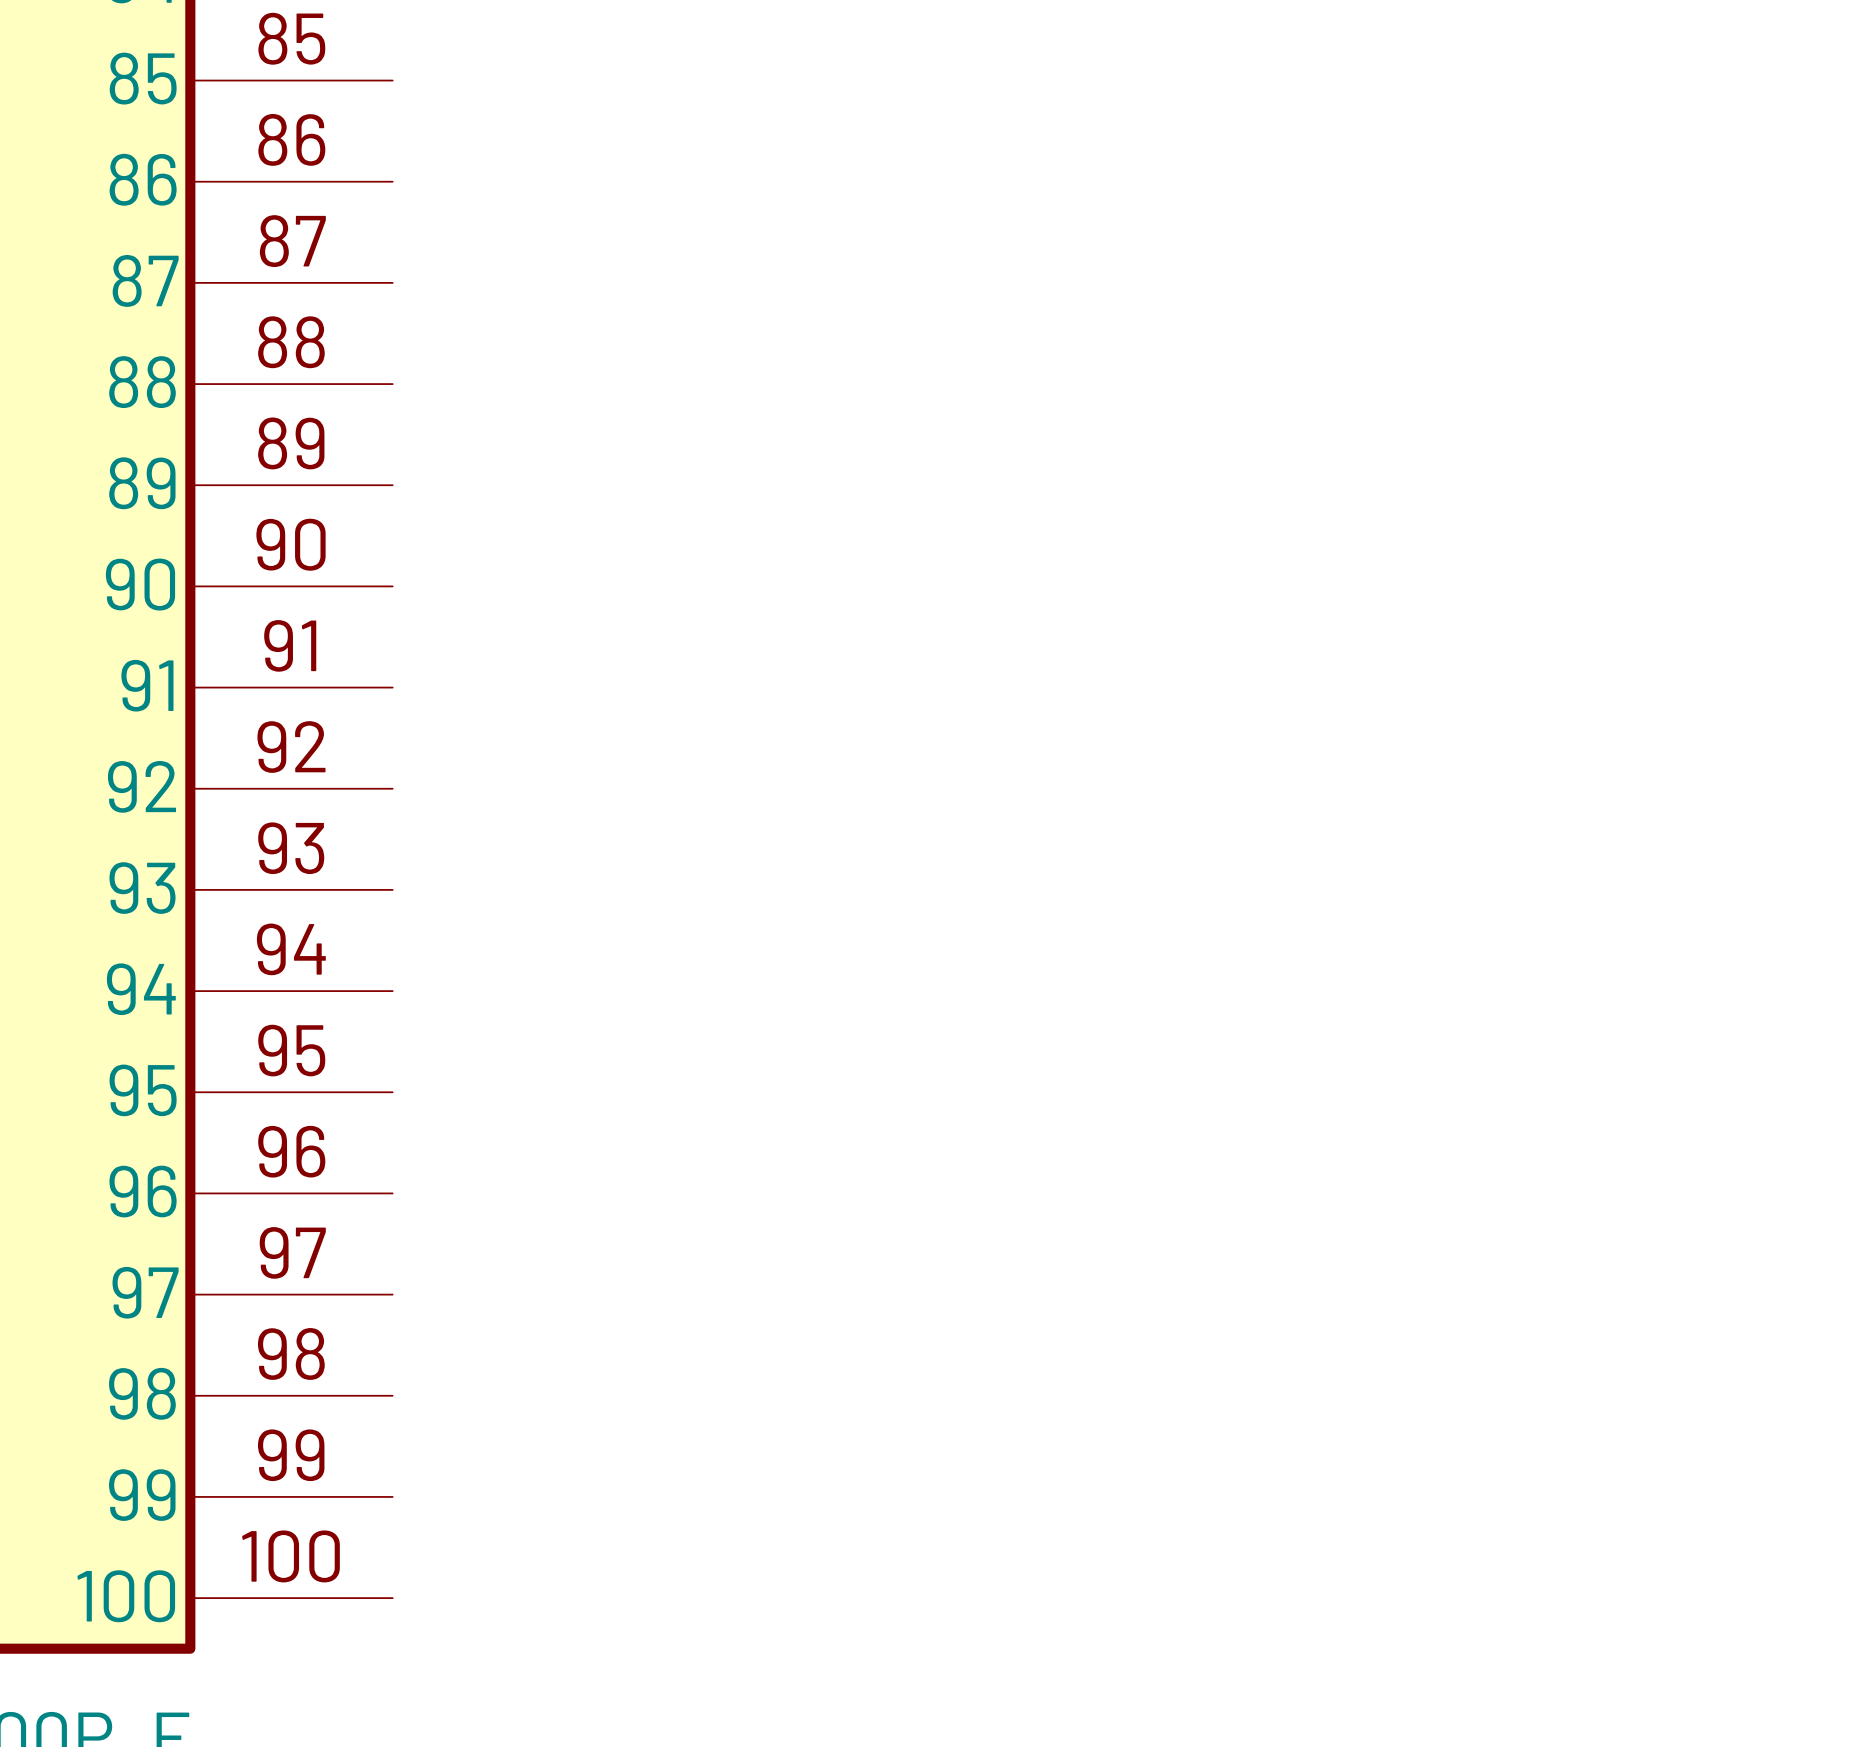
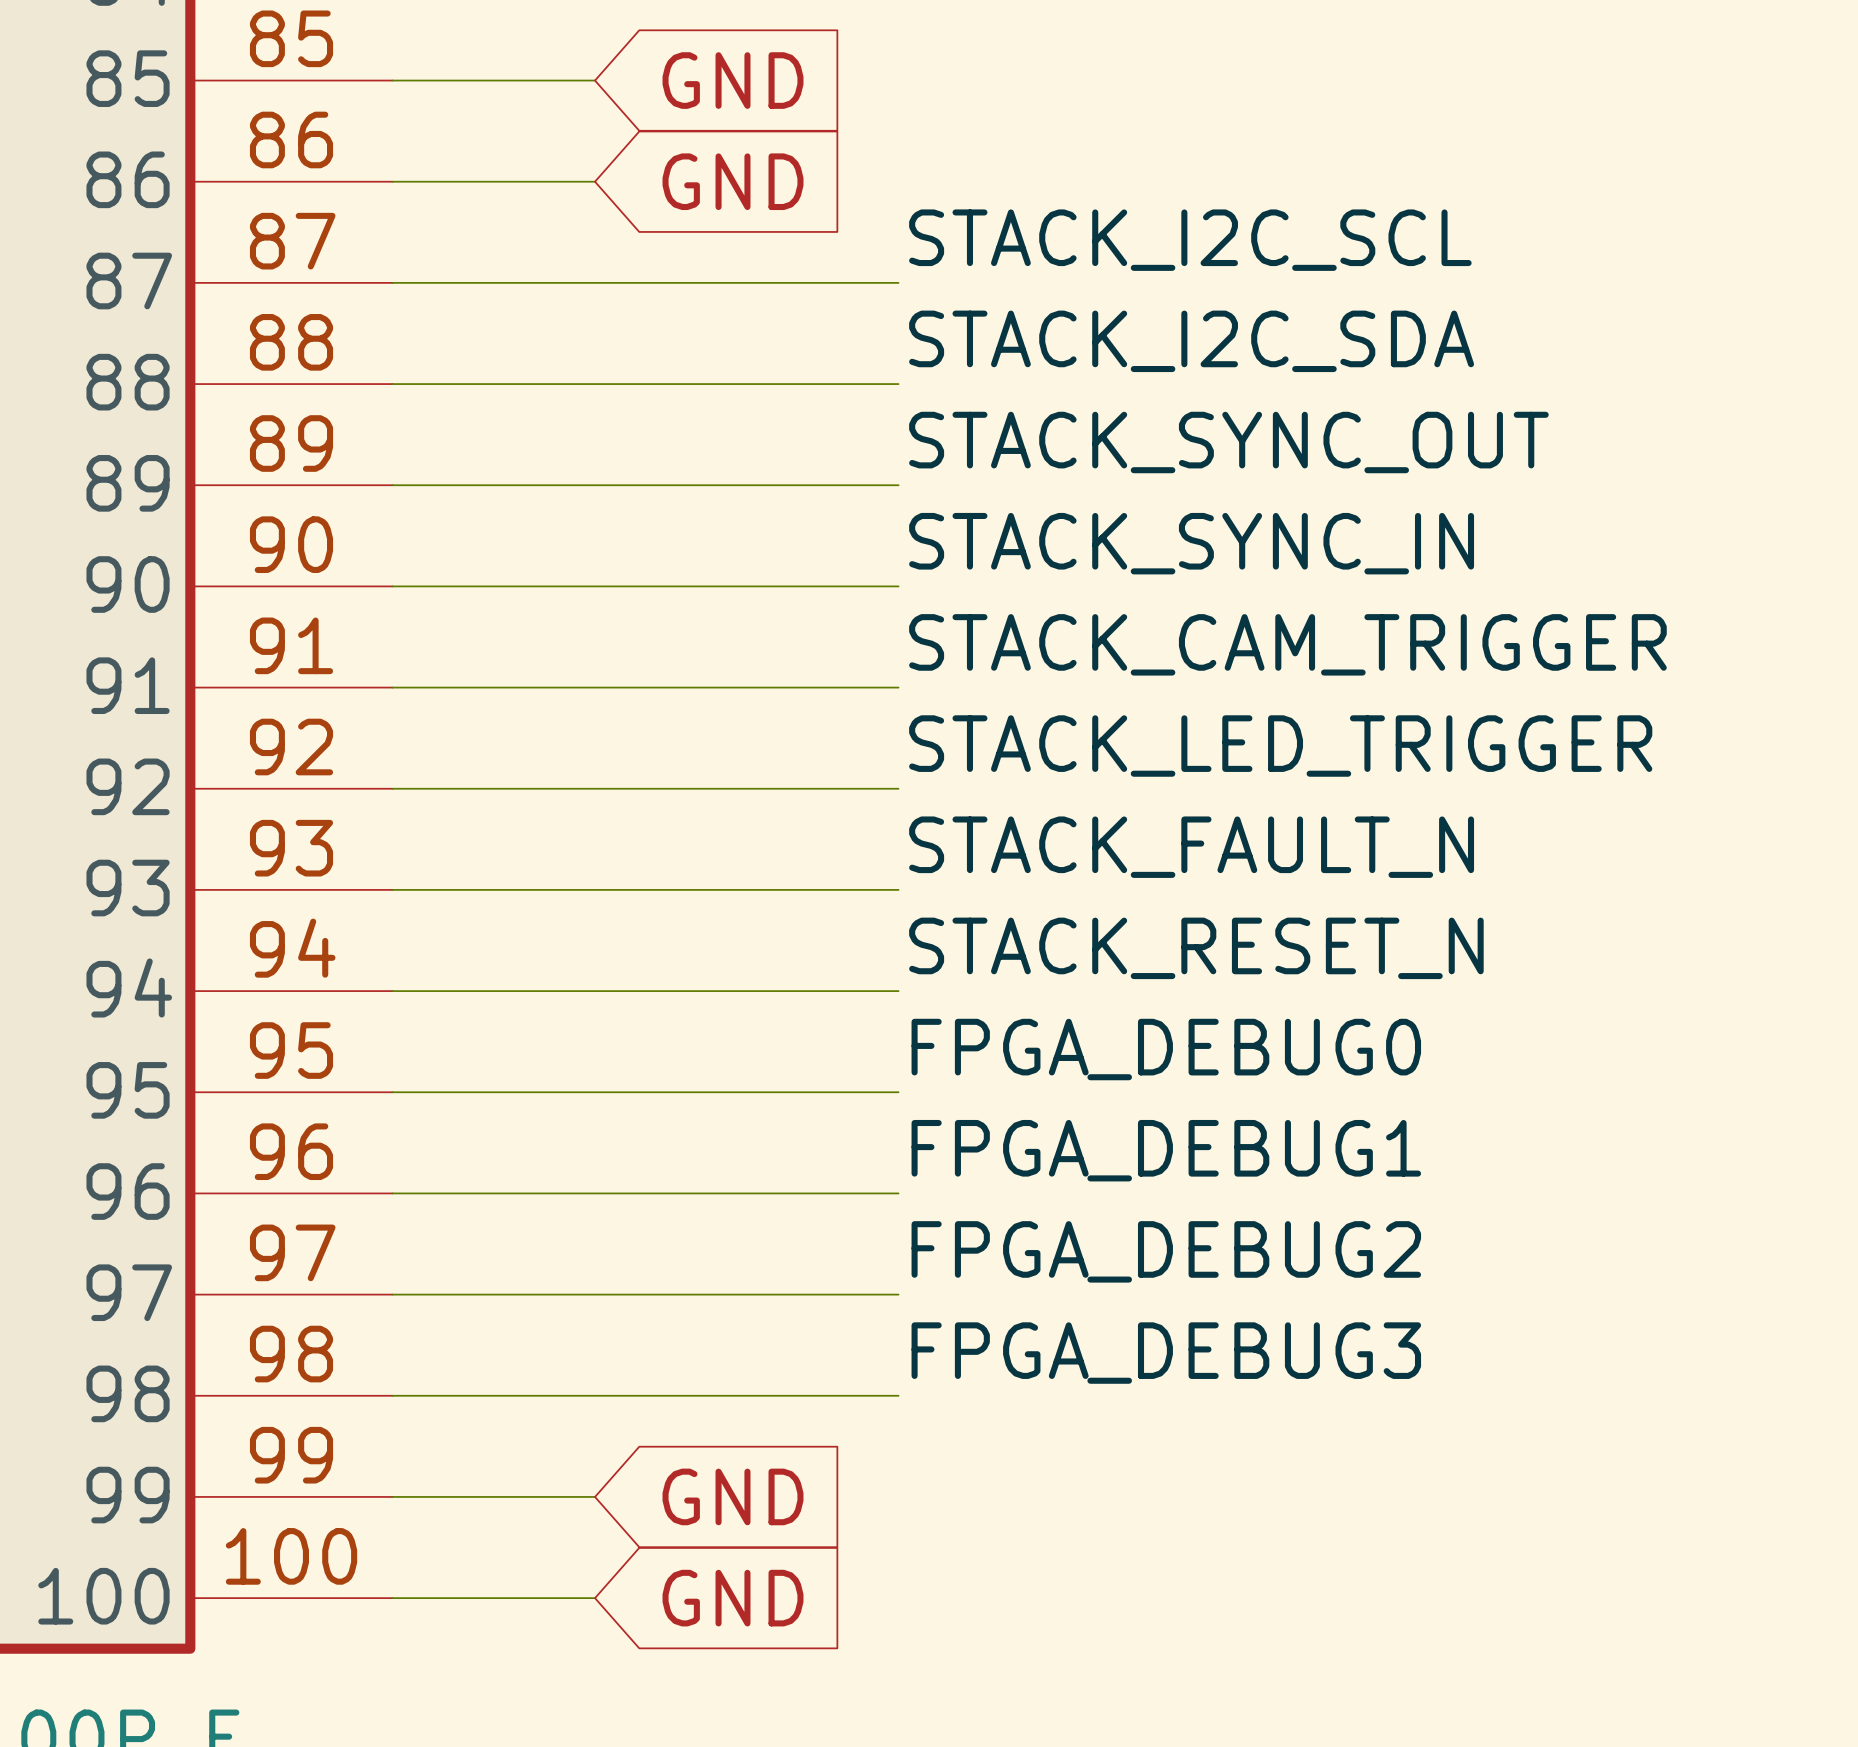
wire: none -> (392, 80) (595, 80)
global label: none -> GND (733, 80)
wire: none -> (392, 181) (595, 181)
global label: none -> GND (733, 181)
label: none -> STACK_I2C_SCL (1190, 240)
wire: none -> (392, 282) (898, 282)
label: none -> STACK_I2C_SDA (1191, 341)
wire: none -> (392, 384) (898, 384)
label: none -> STACK_SYNC_OUT (1228, 442)
wire: none -> (392, 485) (898, 485)
label: none -> STACK_SYNC_IN (1191, 543)
wire: none -> (392, 586) (898, 586)
label: none -> STACK_CAM_TRIGGER (1287, 644)
wire: none -> (392, 687) (898, 687)
label: none -> STACK_LED_TRIGGER (1280, 746)
wire: none -> (392, 788) (898, 788)
label: none -> STACK_FAULT_N (1191, 847)
wire: none -> (392, 889) (898, 889)
label: none -> STACK_RESET_N (1196, 948)
wire: none -> (392, 991) (898, 991)
label: none -> FPGA_DEBUG0 (1166, 1049)
wire: none -> (392, 1092) (898, 1092)
label: none -> FPGA_DEBUG1 (1166, 1150)
wire: none -> (392, 1193) (898, 1193)
label: none -> FPGA_DEBUG2 (1166, 1251)
wire: none -> (392, 1294) (898, 1294)
label: none -> FPGA_DEBUG3 (1166, 1353)
wire: none -> (392, 1395) (898, 1395)
wire: none -> (392, 1496) (595, 1496)
global label: none -> GND (733, 1496)
wire: none -> (392, 1598) (595, 1598)
global label: none -> GND (733, 1598)

